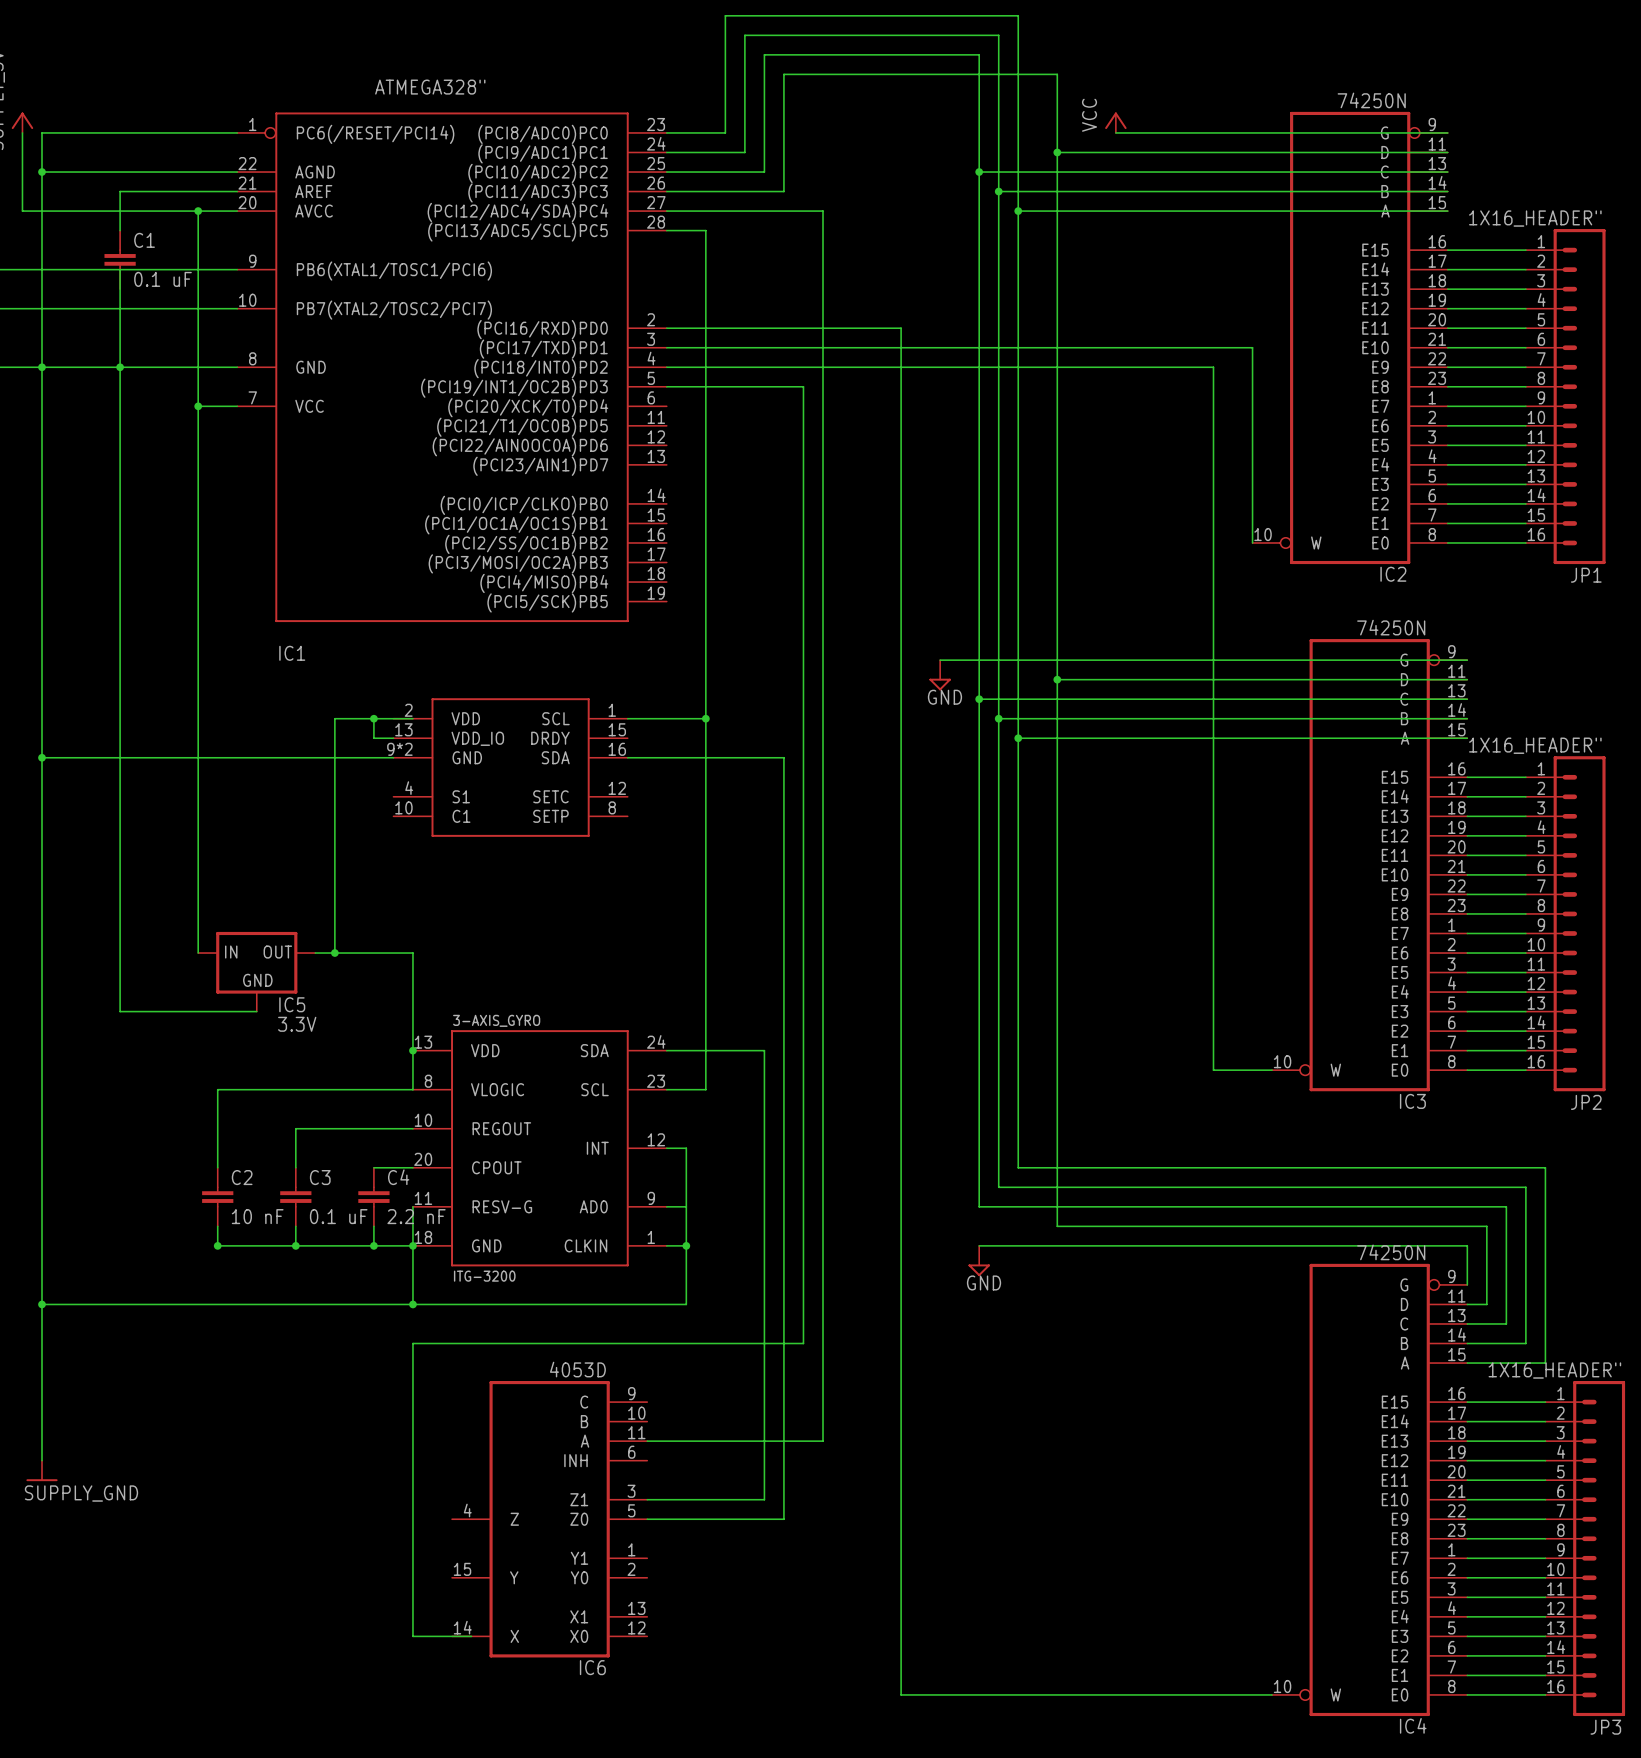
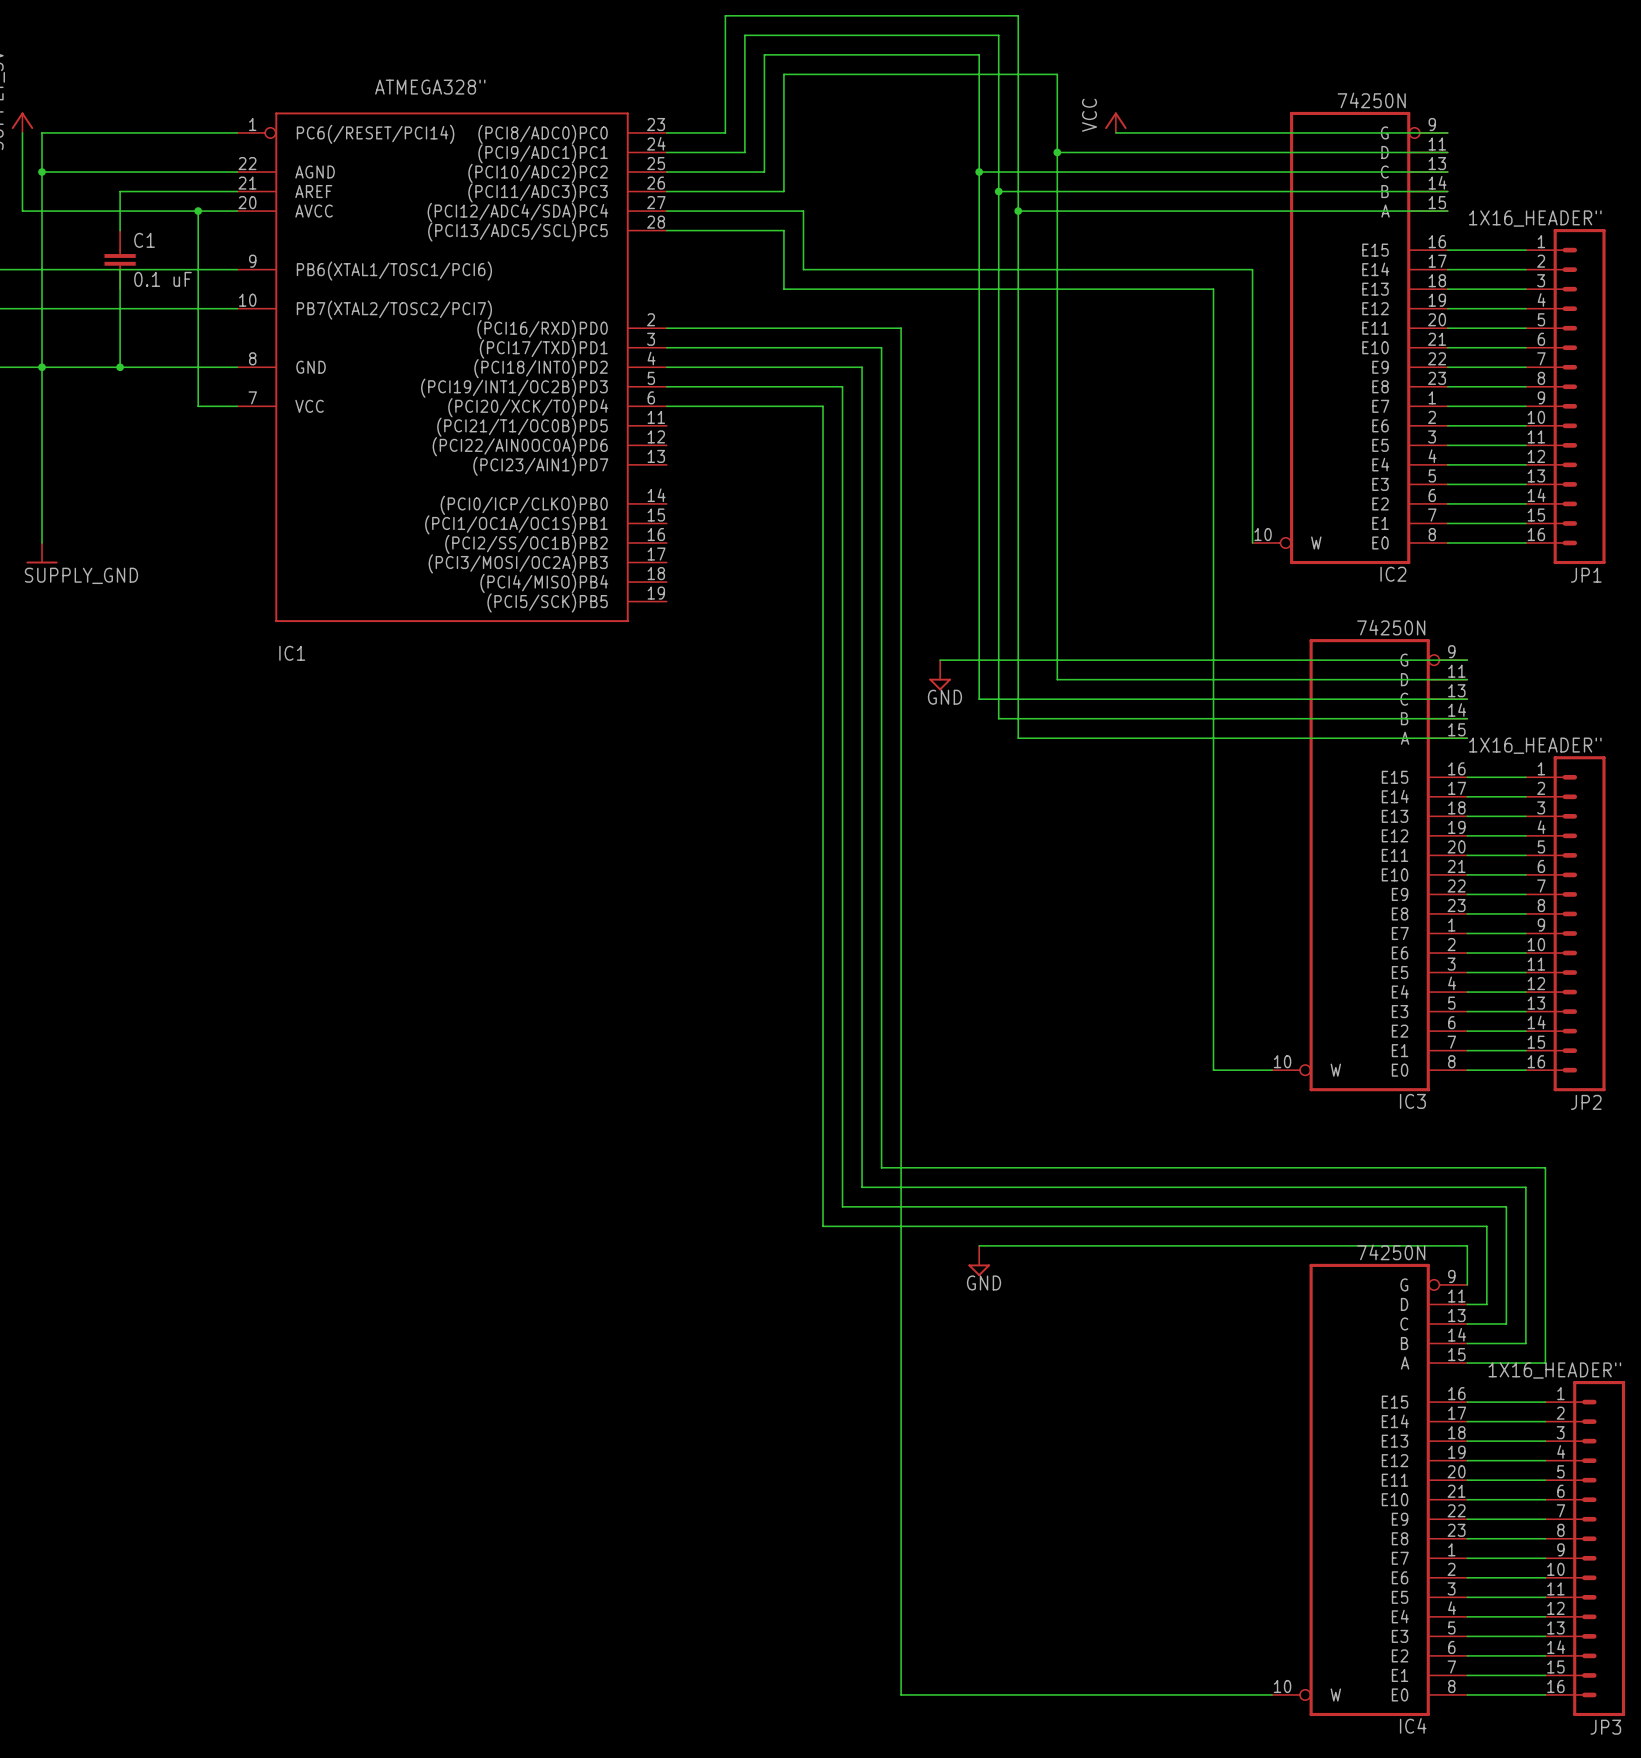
wire: (803, 211) (823, 211) (823, 406) -> (666, 406) (823, 406)
wire: (705, 230) (705, 1089) (666, 1089) -> none
wire: (881, 347) (1252, 347) -> (803, 211) (803, 269) (1252, 269) (1252, 347)
wire: (120, 367) (120, 1011) (256, 1011) -> none
wire: (862, 367) (1213, 367) -> (705, 230) (783, 230) (783, 289) (1213, 289) (1213, 367)
wire: (803, 386) (803, 1343) (412, 1343) (412, 1636) (471, 1636) -> none
wire: (198, 406) (198, 953) -> none
junction: (198, 406) -> none
wire: (42, 542) (42, 1460) -> none
power symbol: none -> SUPPLY_GND (42, 553)
wire: (1057, 679) (1057, 1226) -> none
junction: (1057, 679) -> none
wire: (979, 699) (979, 1206) -> (803, 386) (842, 386) (842, 1206) (979, 1206)
junction: (979, 699) -> none
wire: (373, 718) (373, 738) (393, 738) -> none
junction: (373, 718) -> none
wire: (412, 718) (334, 718) (334, 953) -> none
wire: (627, 718) (705, 718) -> none
junction: (705, 718) -> none
wire: (998, 718) (998, 1187) -> (862, 367) (862, 1187) (998, 1187)
junction: (998, 718) -> none
wire: (1018, 738) (1018, 1167) -> (881, 347) (881, 1167) (1018, 1167)
junction: (1018, 738) -> none
wire: (42, 757) (393, 757) -> none
junction: (42, 757) -> none
wire: (627, 757) (783, 757) (783, 1519) (647, 1519) -> none
part: (510, 767) -> none
wire: (315, 953) (412, 953) (412, 1089) (217, 1089) (217, 1167) -> none
junction: (334, 953) -> none
IC5: 3.3V (256, 971) -> none
junction: (412, 1050) -> none
wire: (666, 1050) (764, 1050) (764, 1499) (647, 1499) -> none
wire: (412, 1128) (295, 1128) (295, 1167) -> none
3-AXIS_GYRO: ITG-3200 (539, 1148) -> none
wire: (666, 1148) (686, 1148) (686, 1304) (42, 1304) -> none
wire: (373, 1167) (412, 1167) -> none
C2: 10 nF (217, 1197) -> none
C3: 0.1 uF (295, 1197) -> none
C4: 2.2 nF (373, 1197) -> none
wire: (412, 1206) (412, 1304) -> none
wire: (666, 1206) (686, 1206) -> none
wire: (217, 1226) (217, 1245) (412, 1245) -> none
wire: (295, 1226) (295, 1245) -> none
wire: (373, 1226) (373, 1245) -> none
wire: (823, 1226) (823, 1441) (647, 1441) -> (823, 1226) (1057, 1226)
junction: (217, 1245) -> none
junction: (295, 1245) -> none
junction: (373, 1245) -> none
junction: (412, 1245) -> none
wire: (666, 1245) (686, 1245) -> none
junction: (686, 1245) -> none
junction: (42, 1304) -> none
junction: (412, 1304) -> none
power symbol: SUPPLY_GND (42, 1470) -> none
IC6: 4053D (549, 1519) -> none

